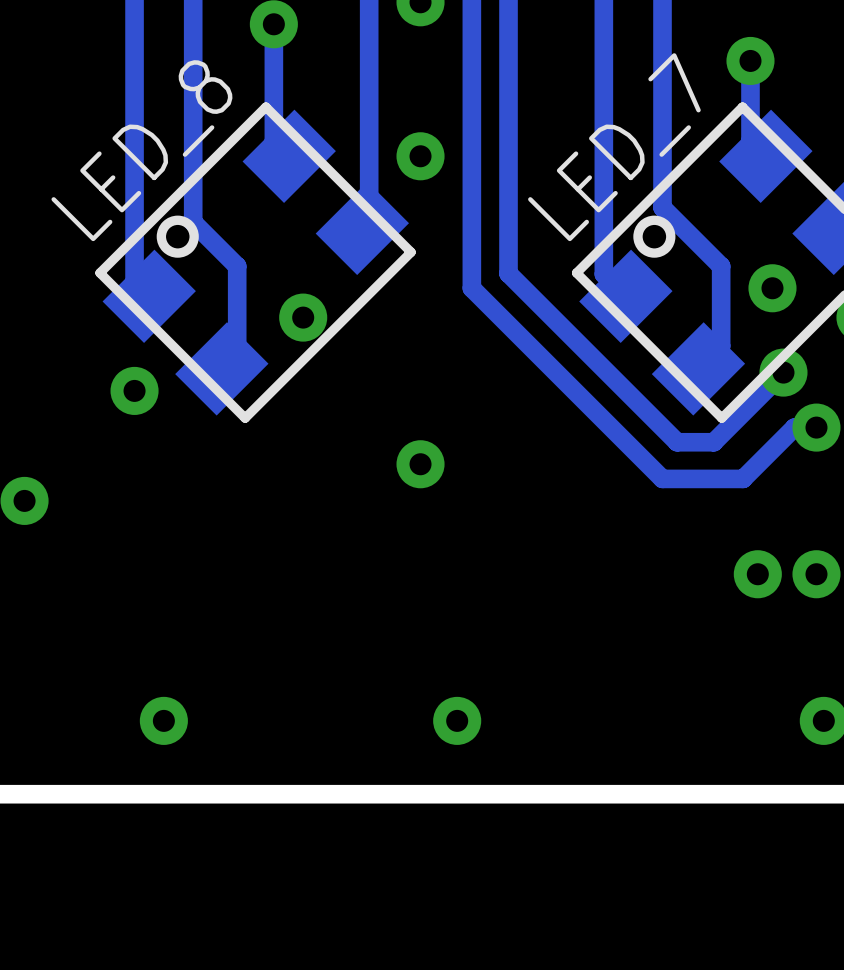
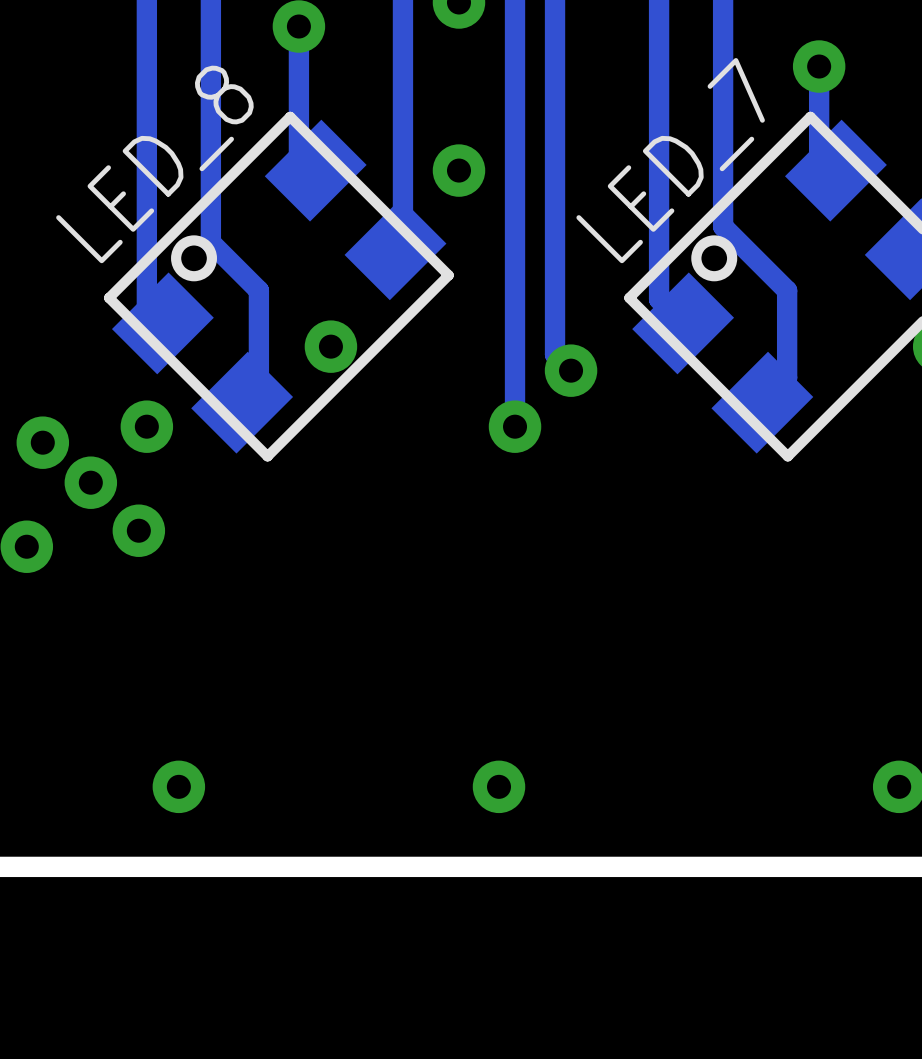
track: (508, 273) (677, 442) (713, 442) (783, 372) -> none
track: (471, 288) (508, 324) -> (555, 298) (555, 354)
track: none -> (515, 314) (515, 426)
via: (772, 288) -> none
track: (523, 339) (662, 478) (743, 478) (794, 427) (816, 427) -> none
via: none -> (571, 370)
via: (783, 372) -> none
via: none -> (515, 426)
via: none -> (42, 442)
via: (816, 427) -> none
via: none -> (90, 482)
via: (420, 464) -> none
via: none -> (138, 530)
via: (757, 574) -> none
via: (816, 574) -> none

